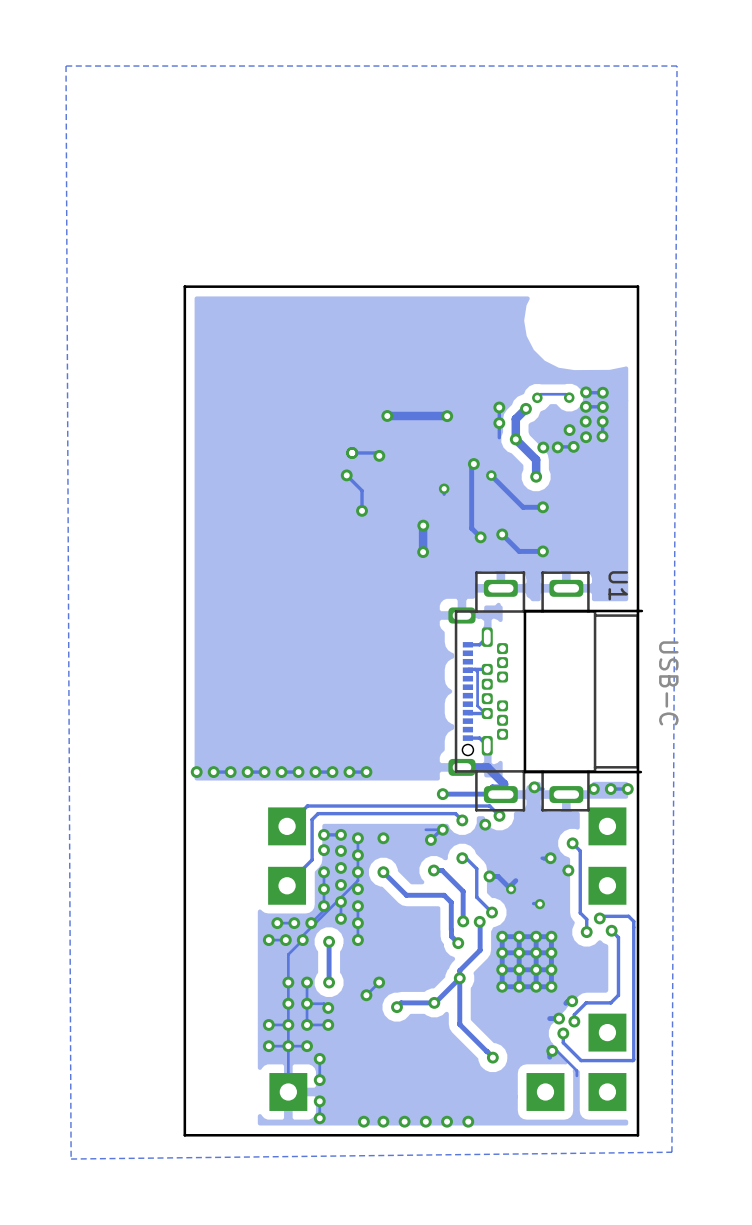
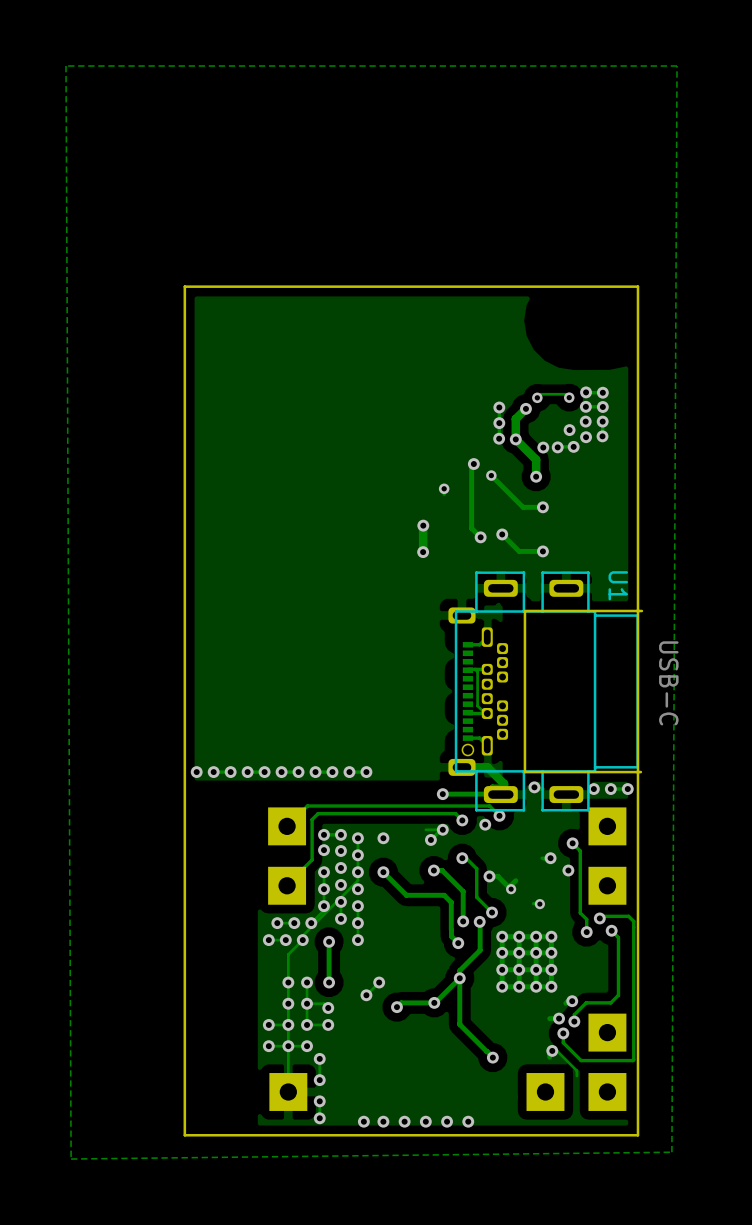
via: (387, 415) -> none
track: (447, 415) (387, 415) -> none
via position: (447, 416) -> (499, 438)
track: (352, 452) (376, 452) (379, 455) -> none
via: (352, 452) -> none
via: (379, 455) -> none
track: (346, 475) (362, 490) (362, 510) -> none
via: (346, 475) -> none
via: (362, 510) -> none

